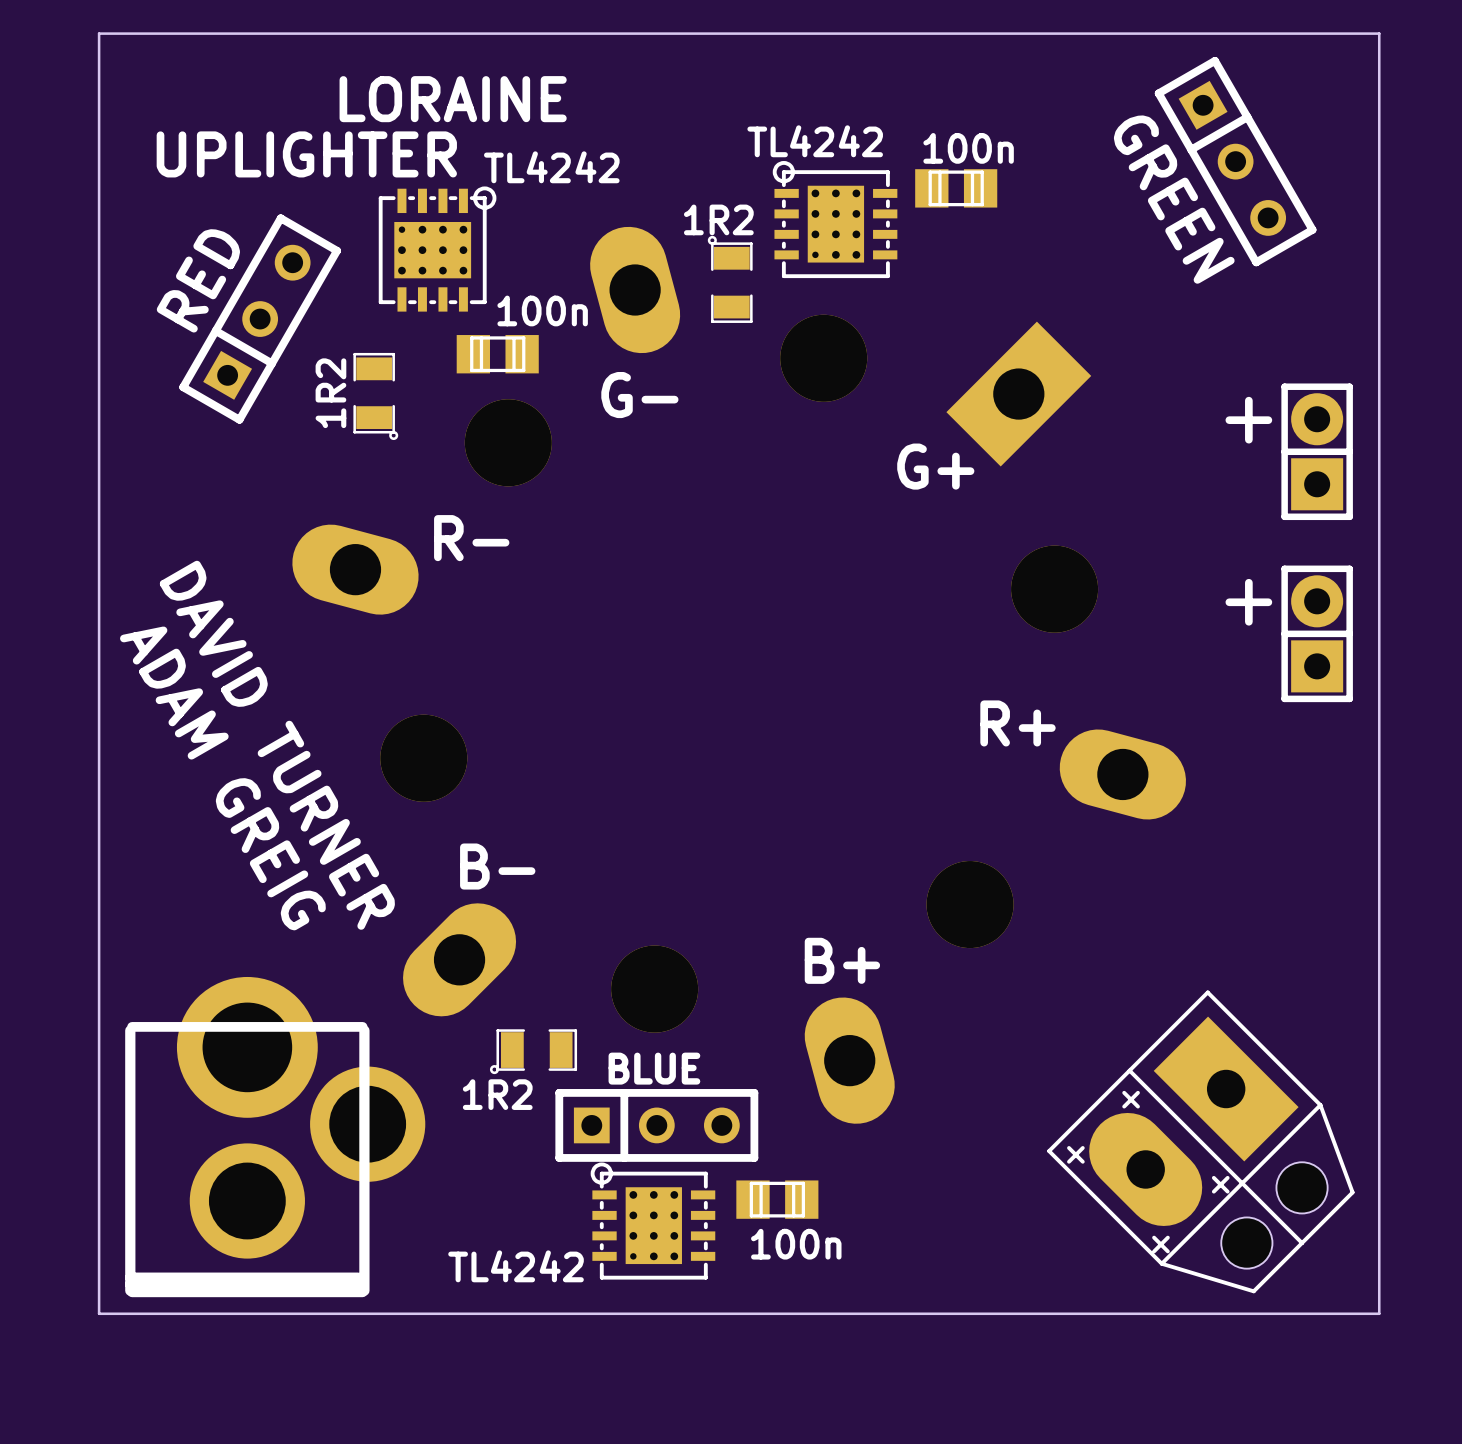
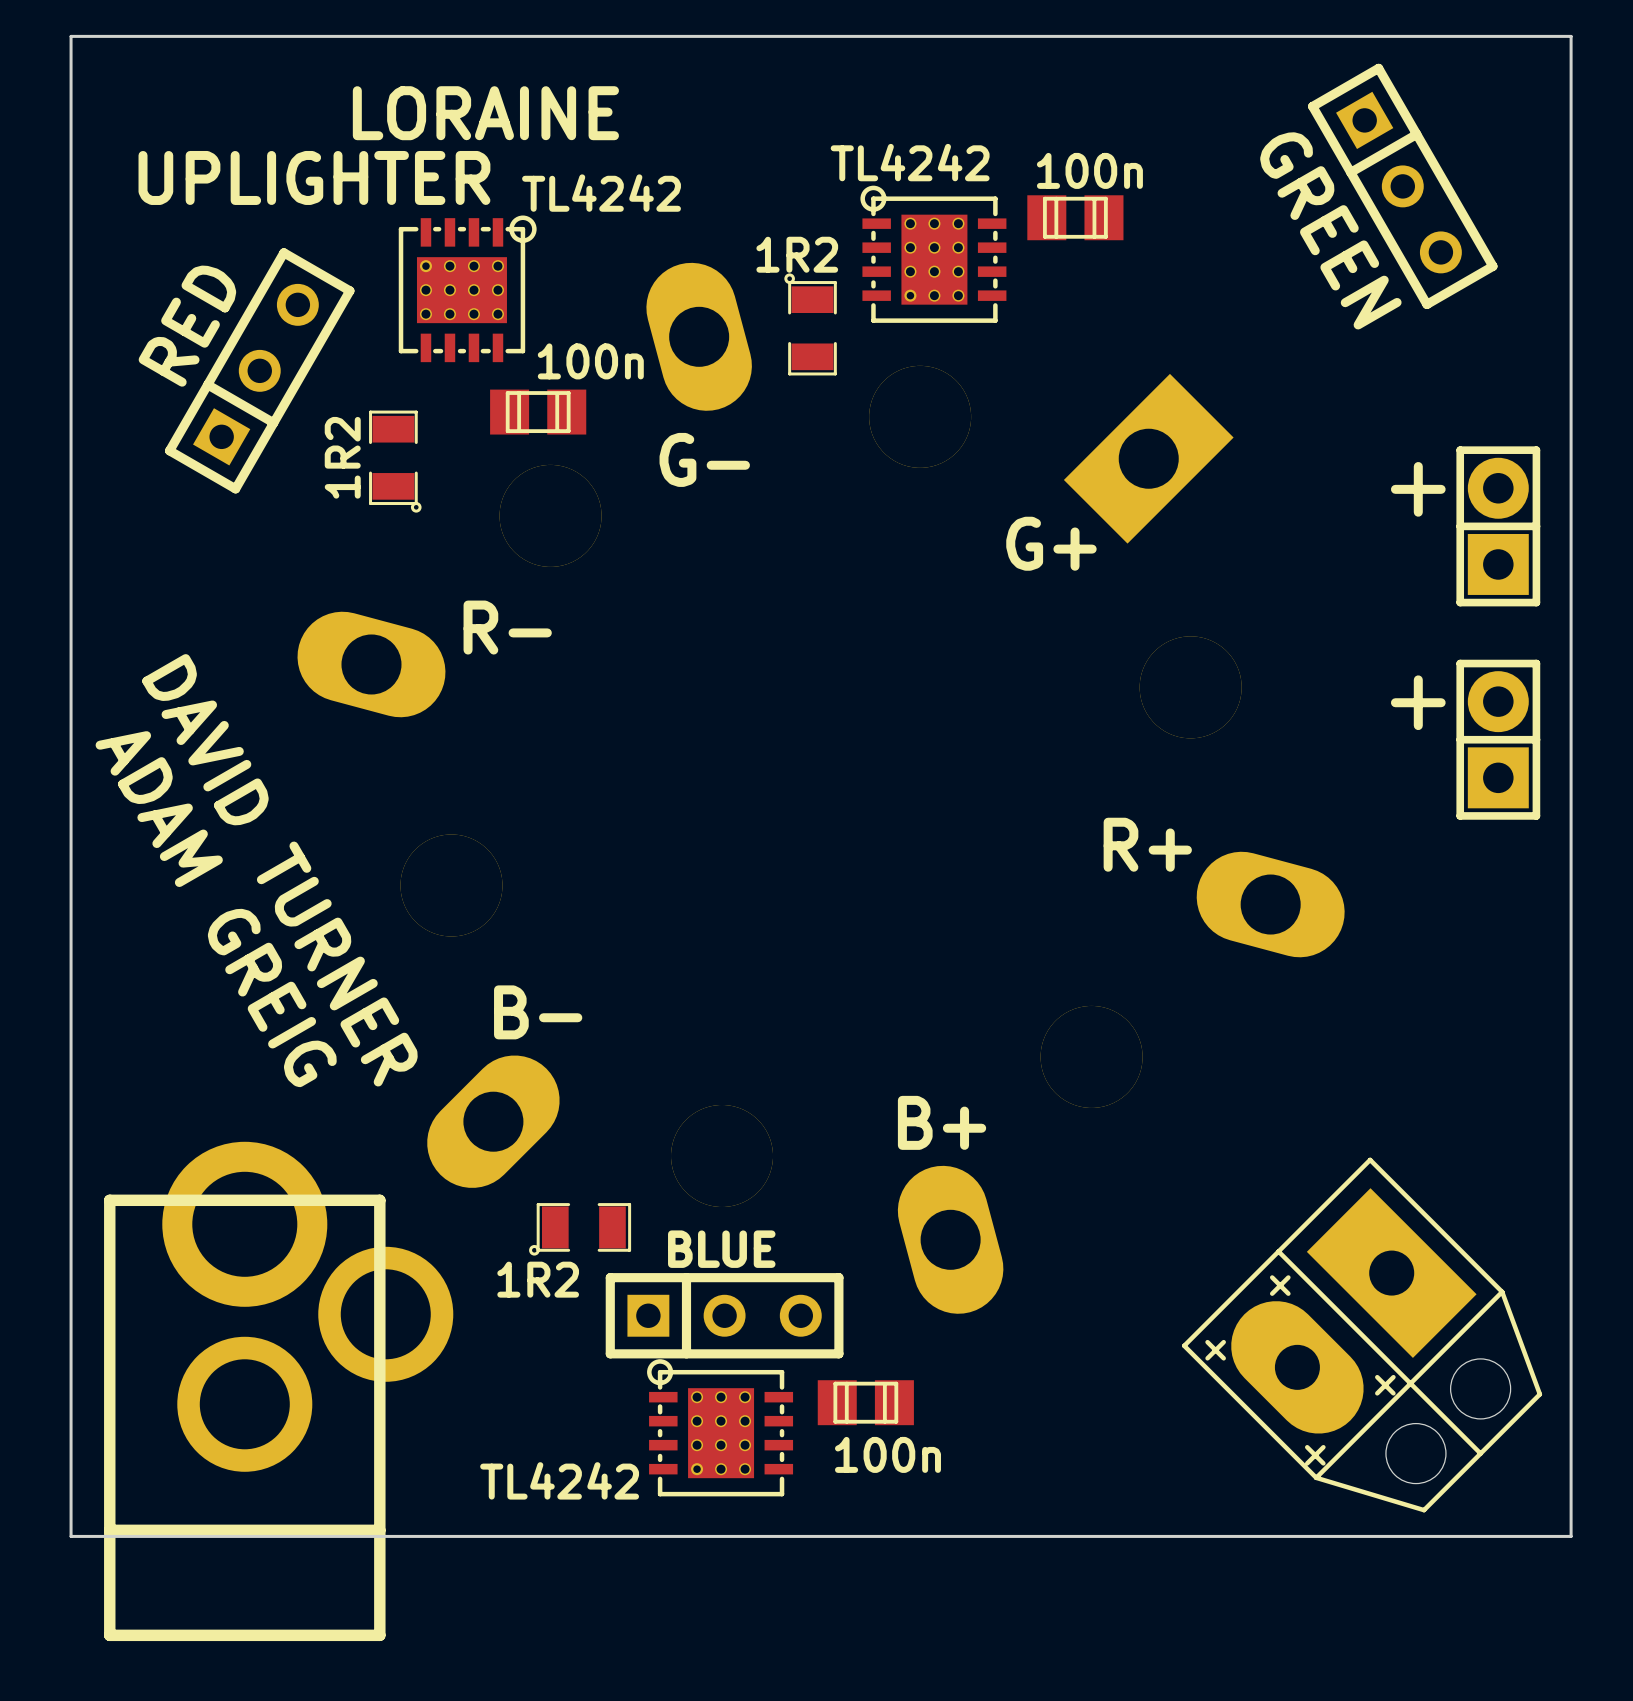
part: (275, 1137) -> none
part: none -> (278, 1391)

